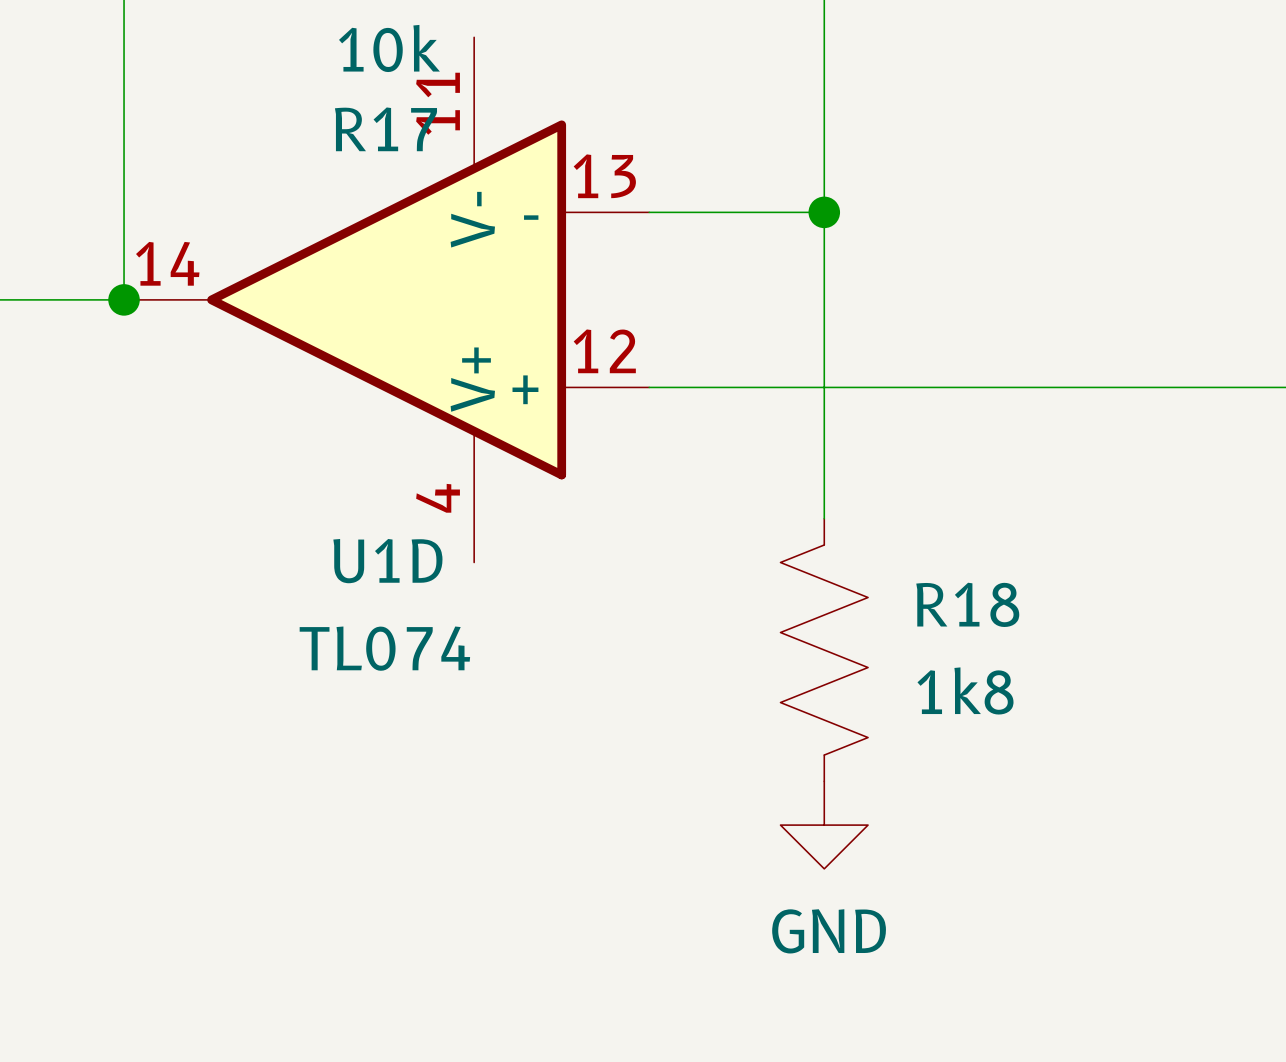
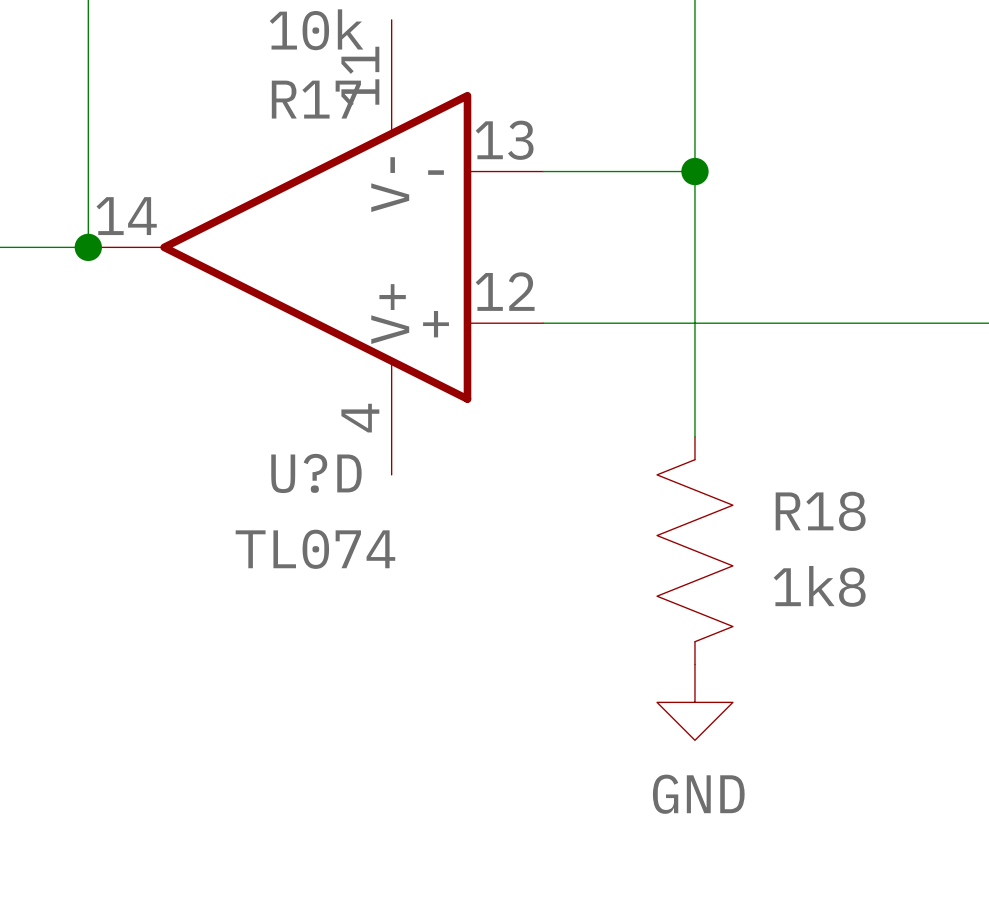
U1D name: U1D (387, 561) -> U?D (316, 473)

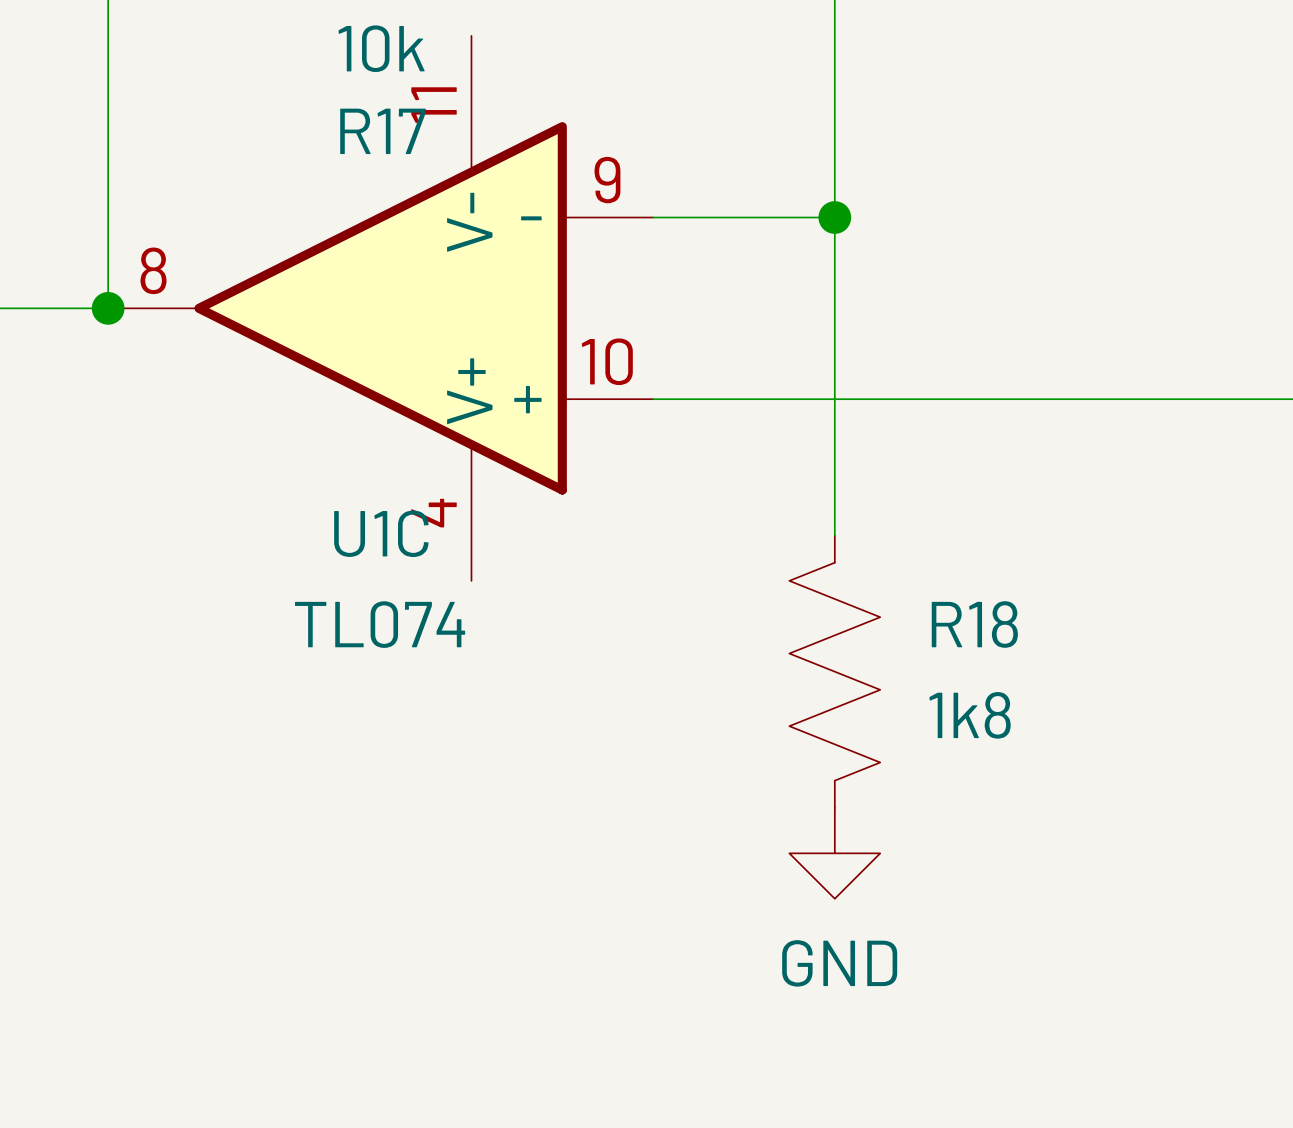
U?D pin number: 13 (504, 140) -> 9 (607, 180)
U?D pin number: 14 (126, 216) -> 8 (153, 270)
U?D pin number: 12 (505, 291) -> 10 (607, 361)
U?D name: U?D (316, 473) -> U1C (381, 533)
U?D value position: TL074 (315, 549) -> TL074 (380, 624)

